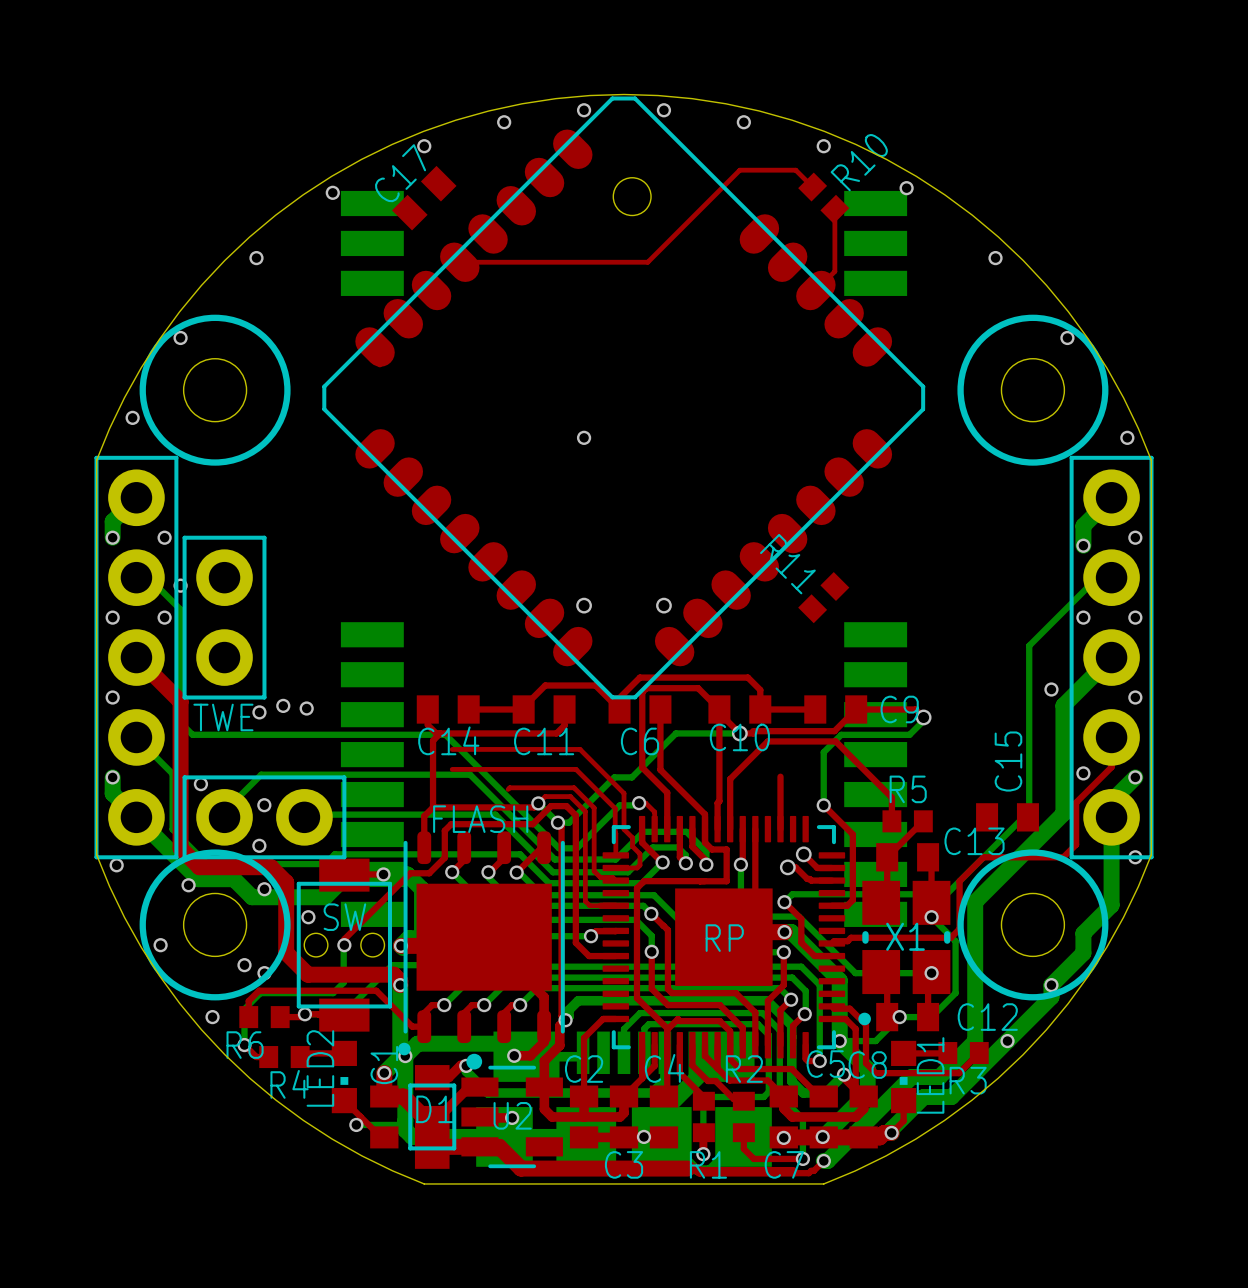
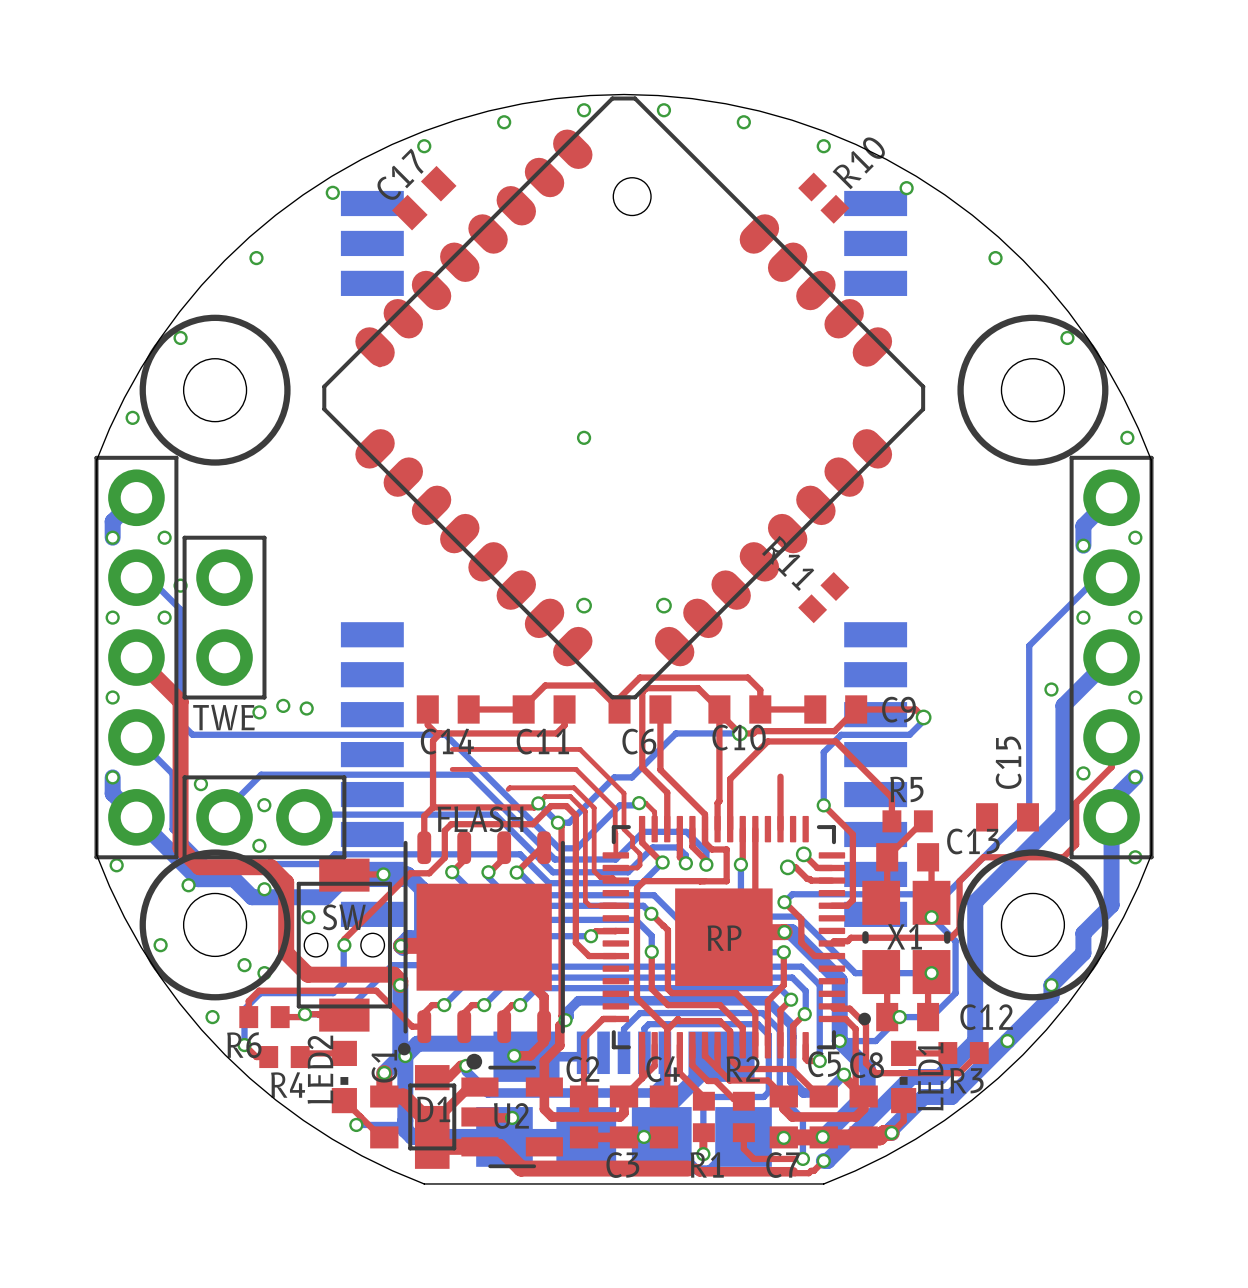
top track: (812, 187) (795, 170) (739, 170) (647, 262) (459, 262) -> none
top track: (834, 209) (834, 271) (815, 290) -> none

